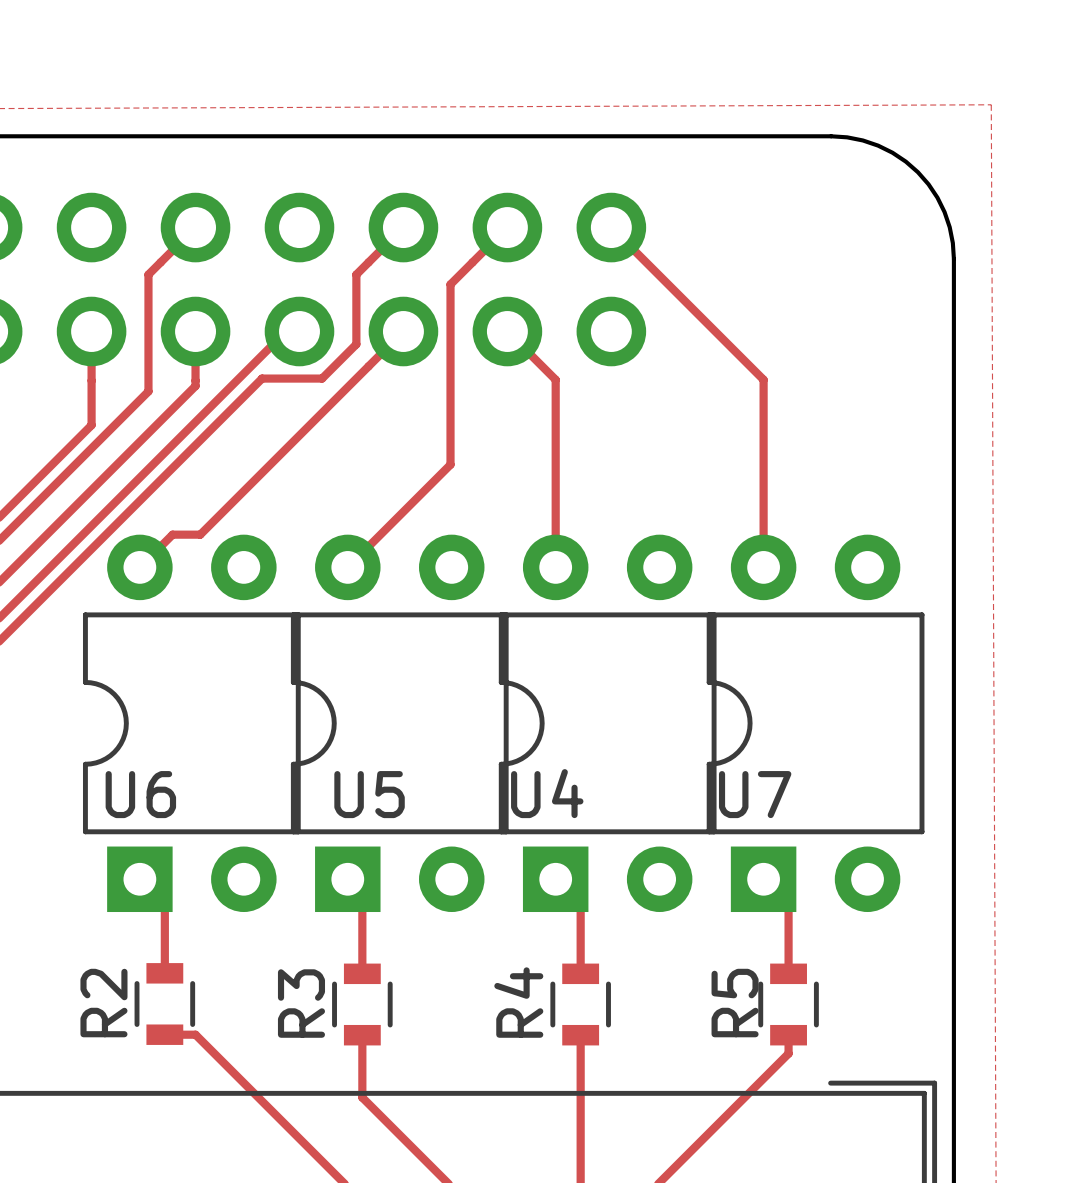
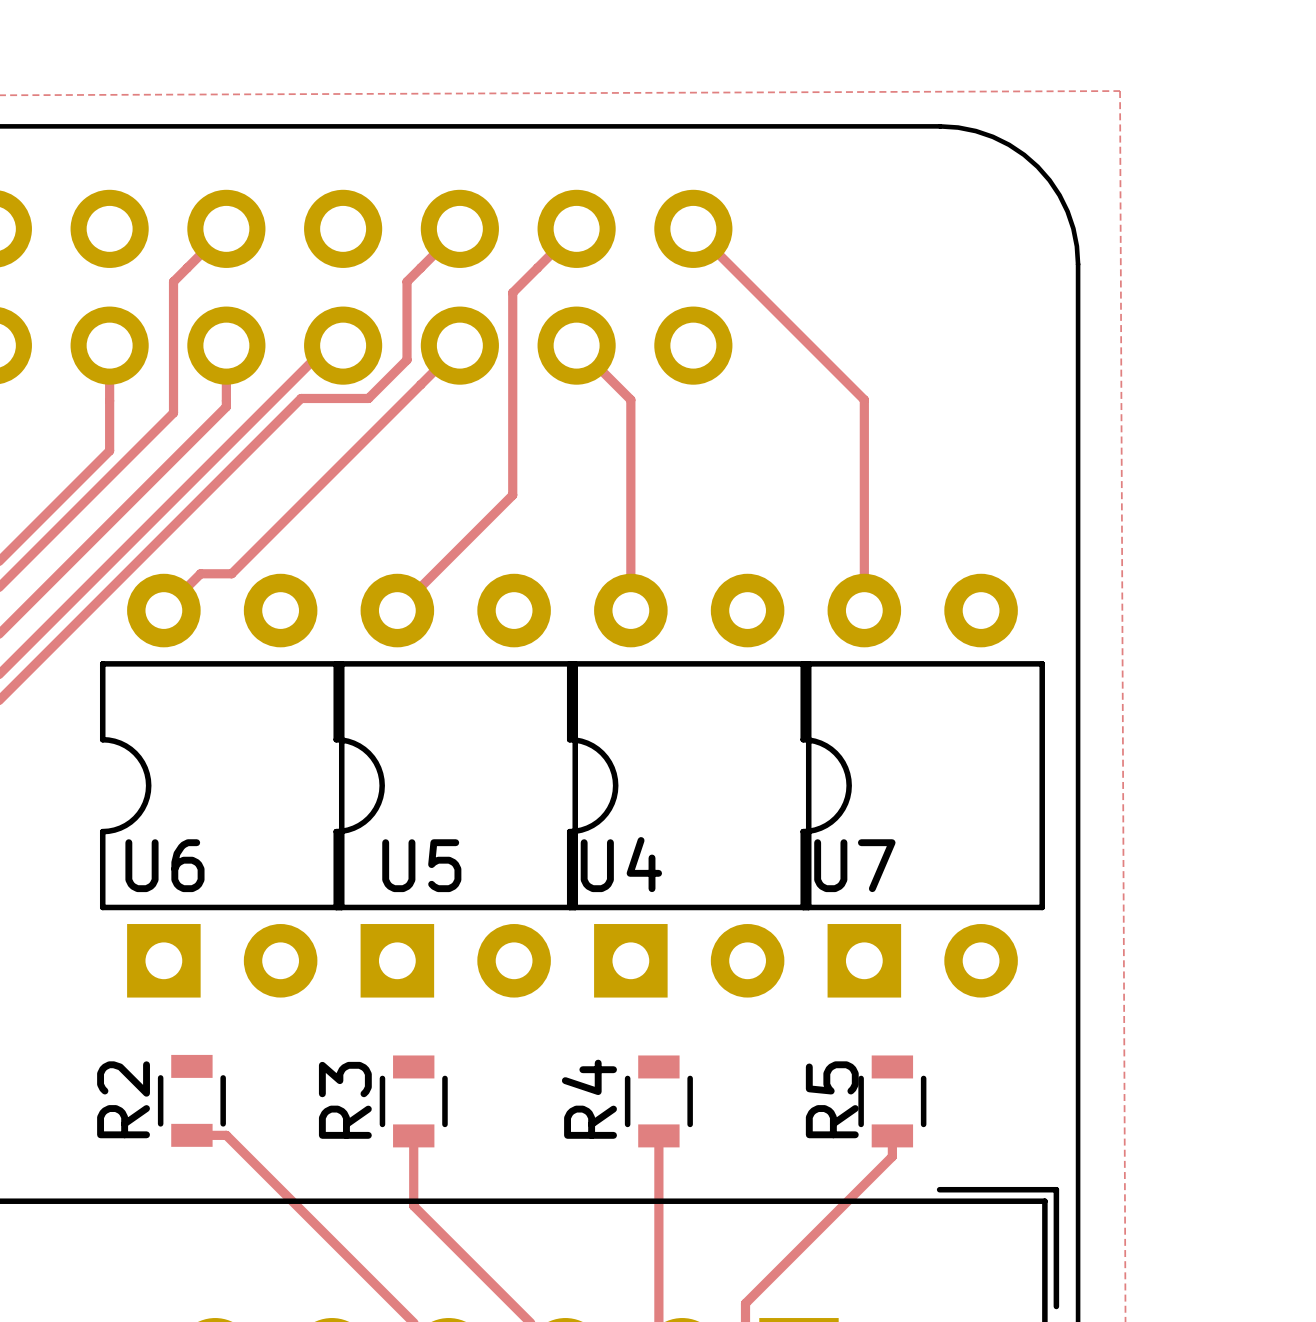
track: (139, 879) (164, 904) (164, 973) -> none
track: (347, 879) (362, 893) (362, 973) -> none
track: (555, 879) (580, 904) (580, 973) -> none
track: (763, 879) (788, 904) (788, 973) -> none

